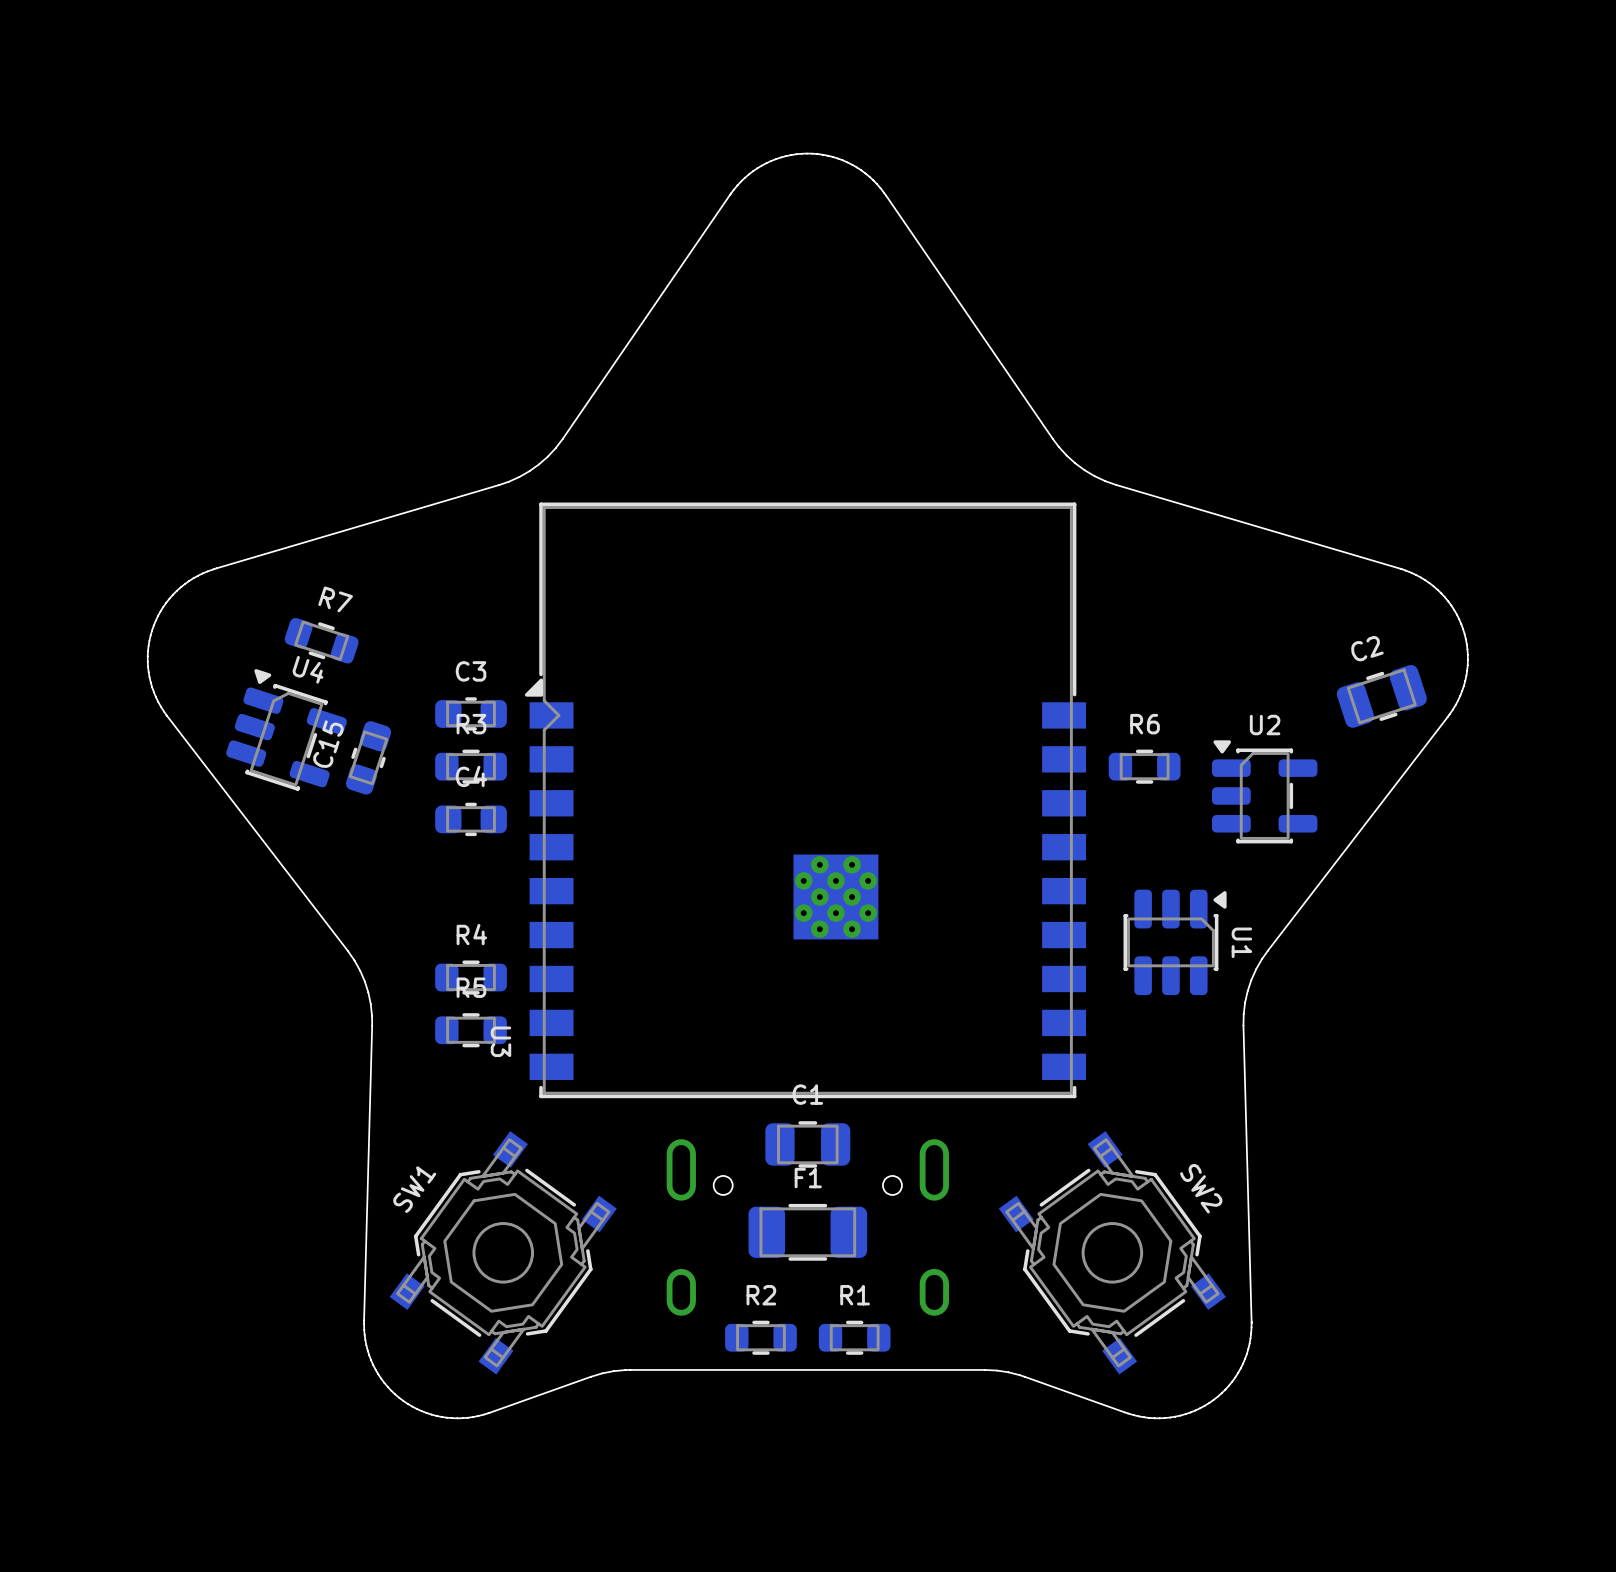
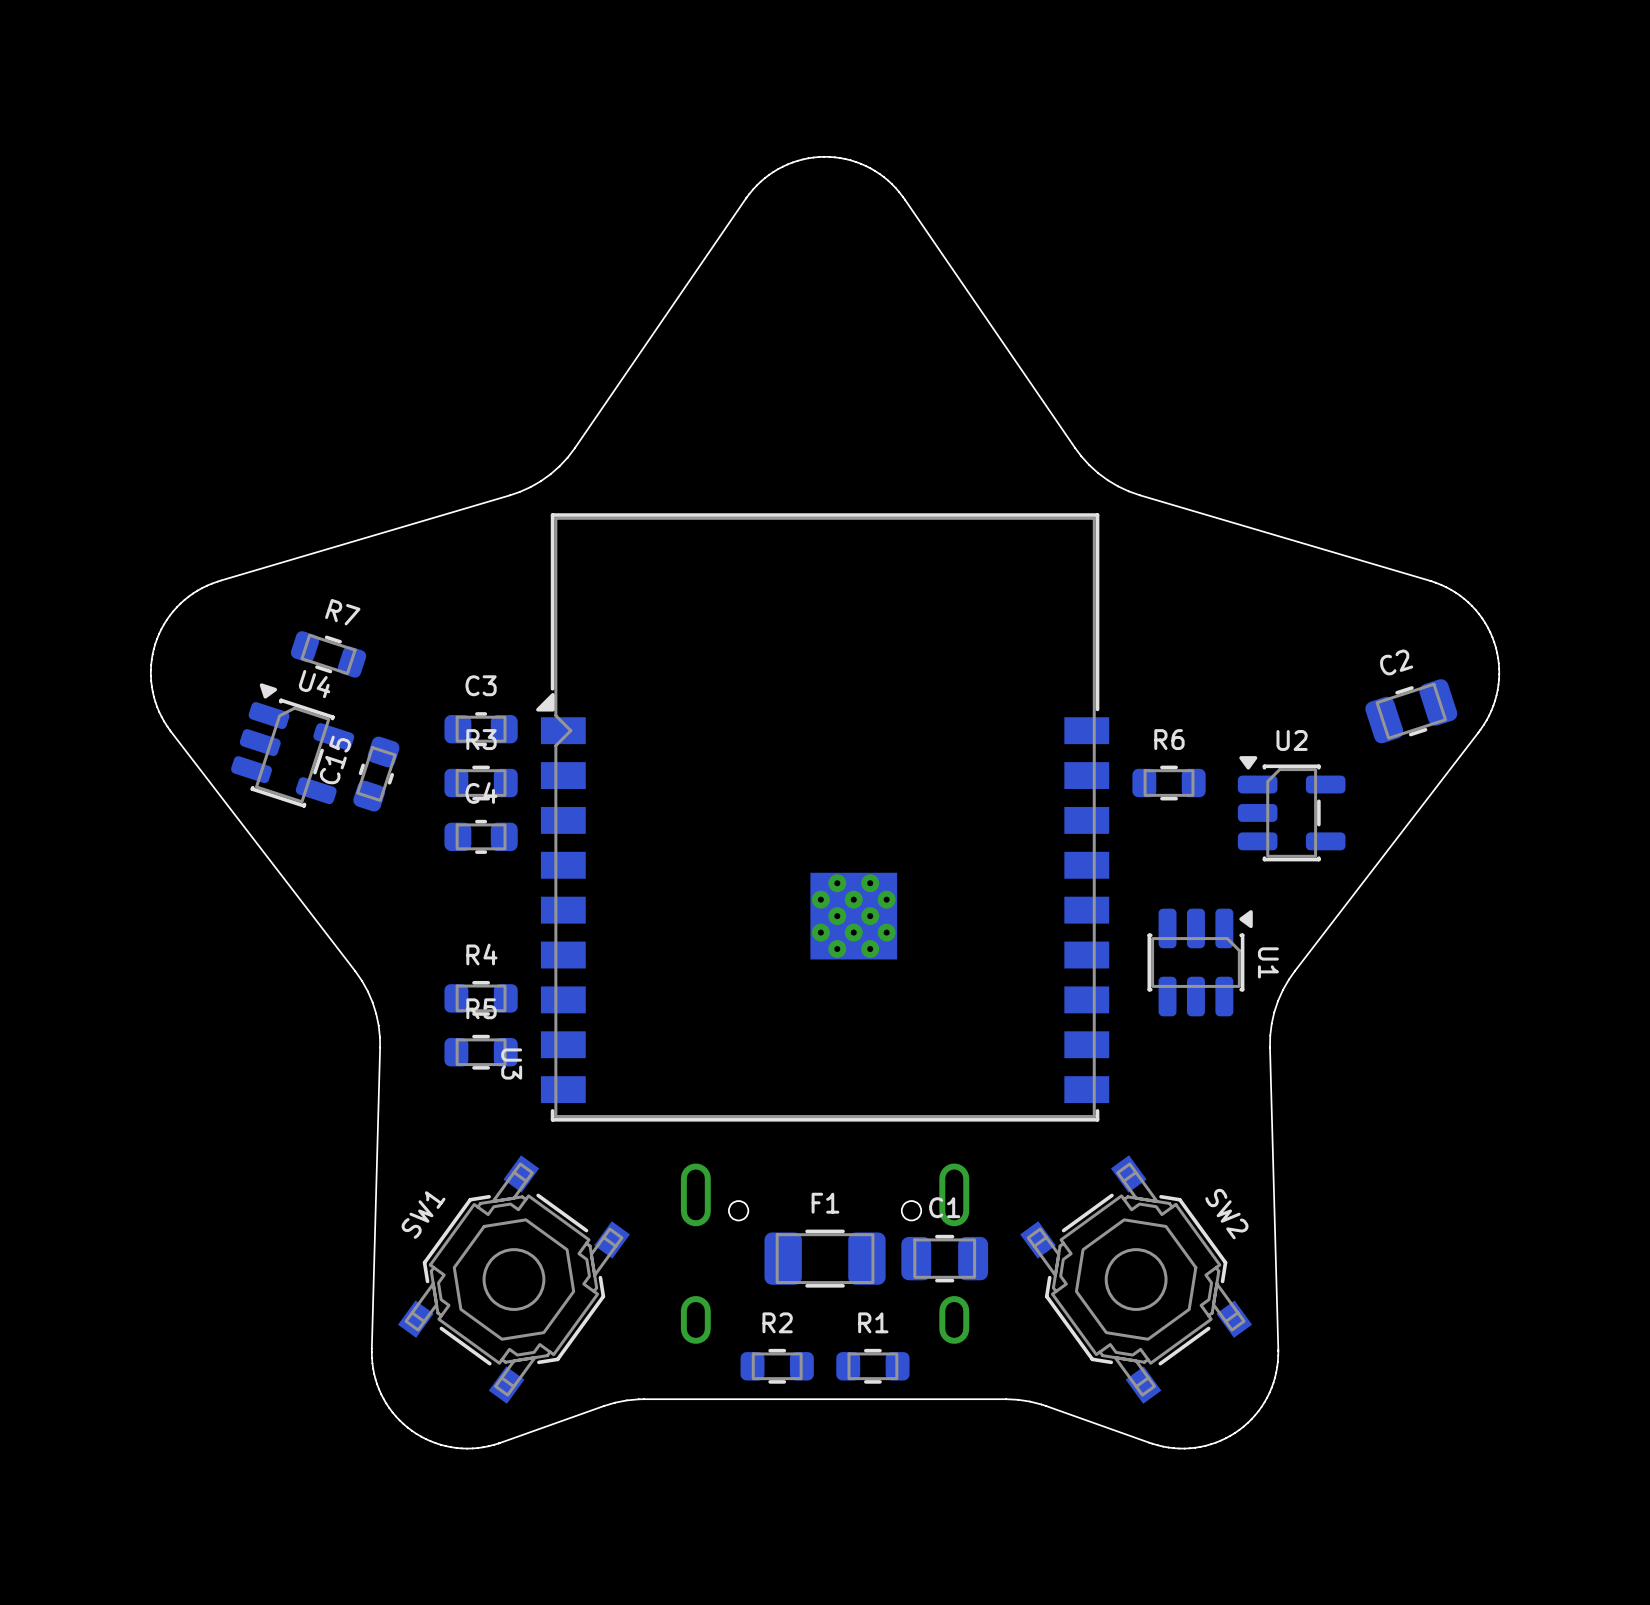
C1 position: (807, 1144) -> (944, 1258)

